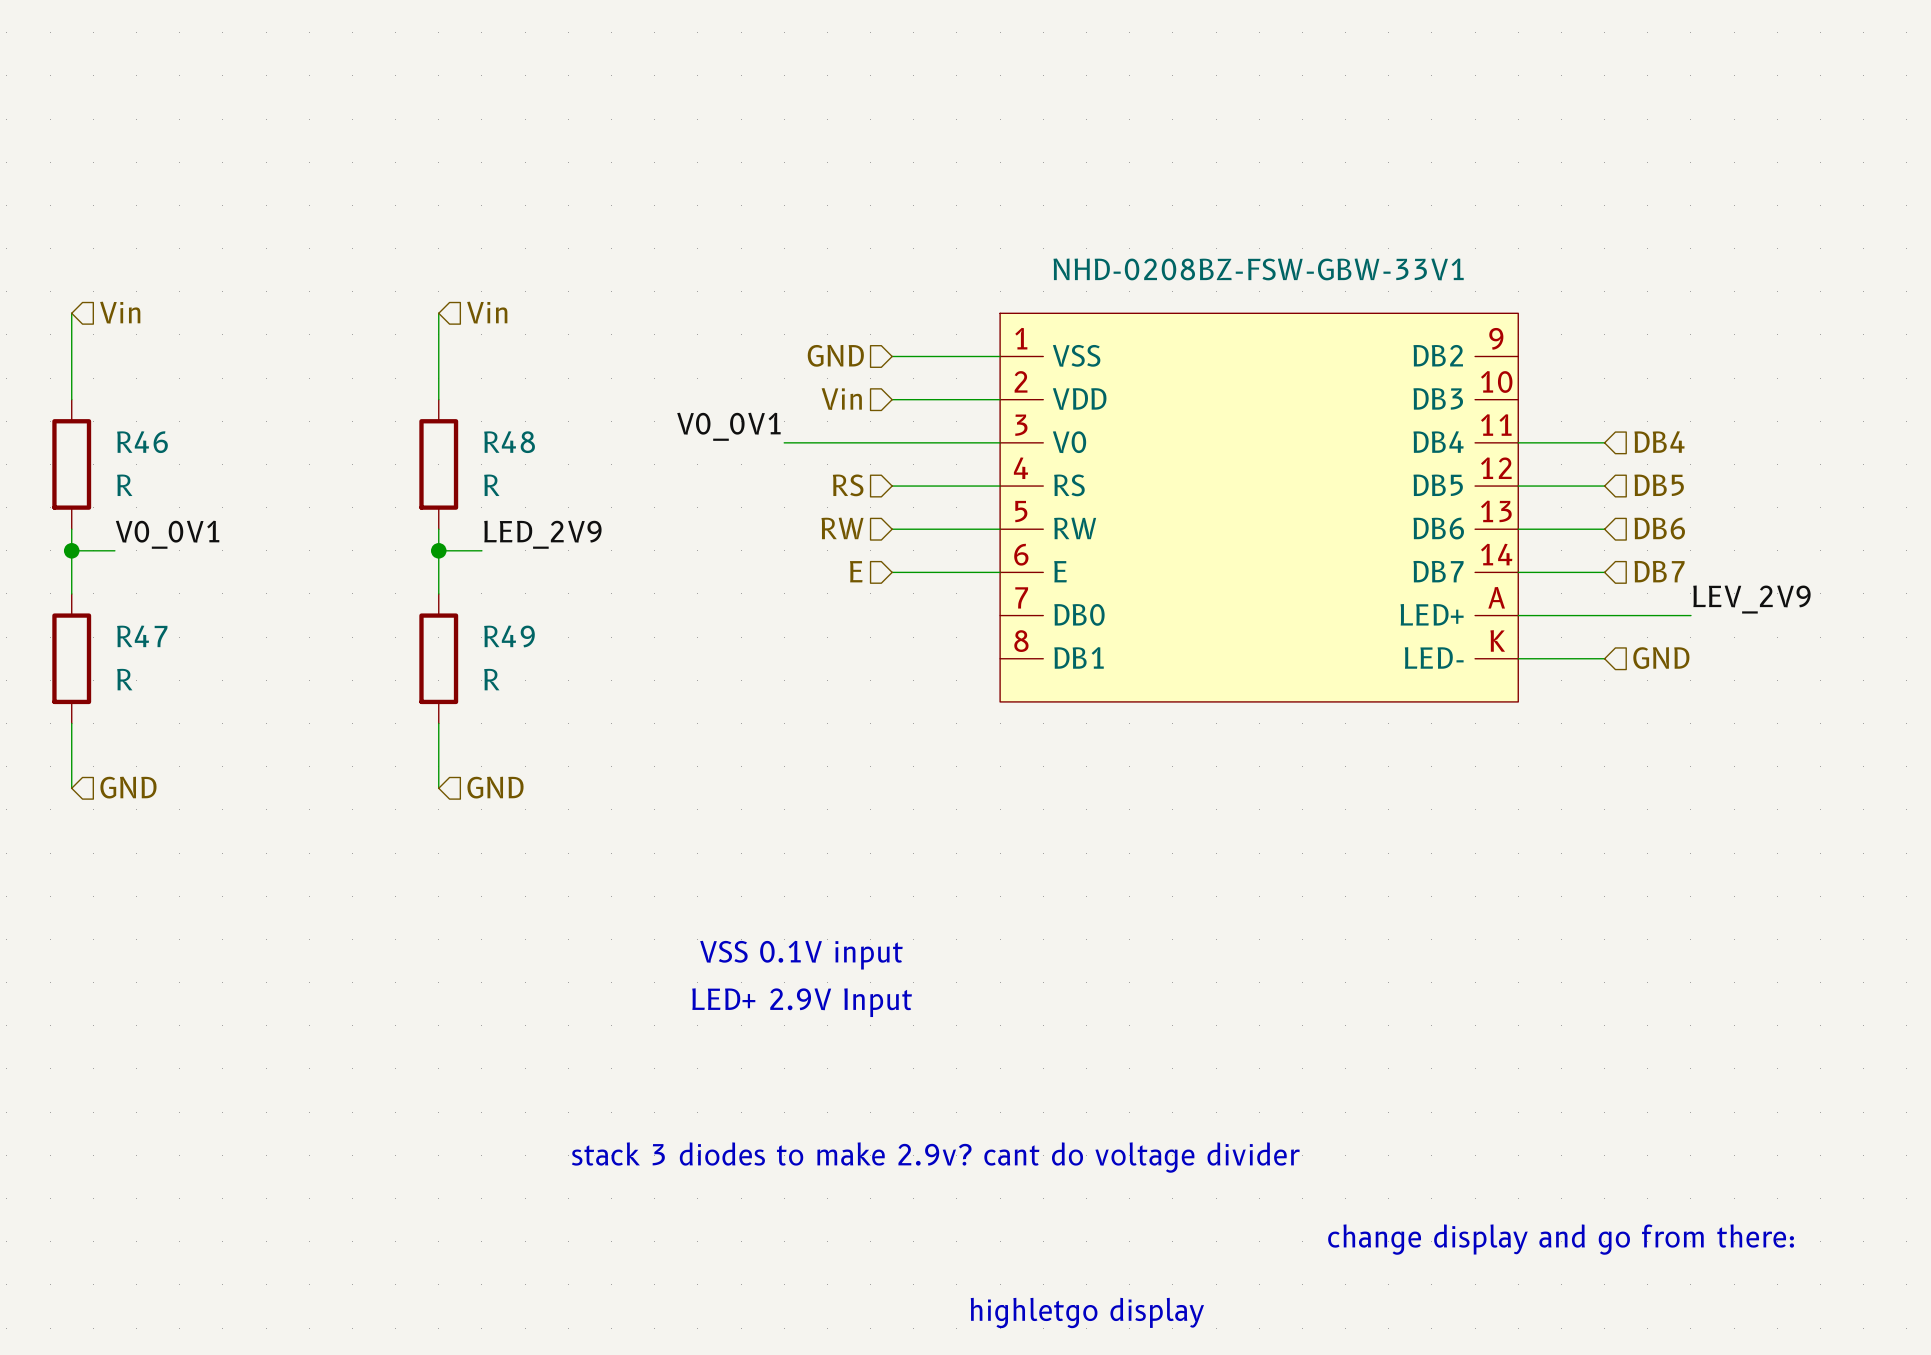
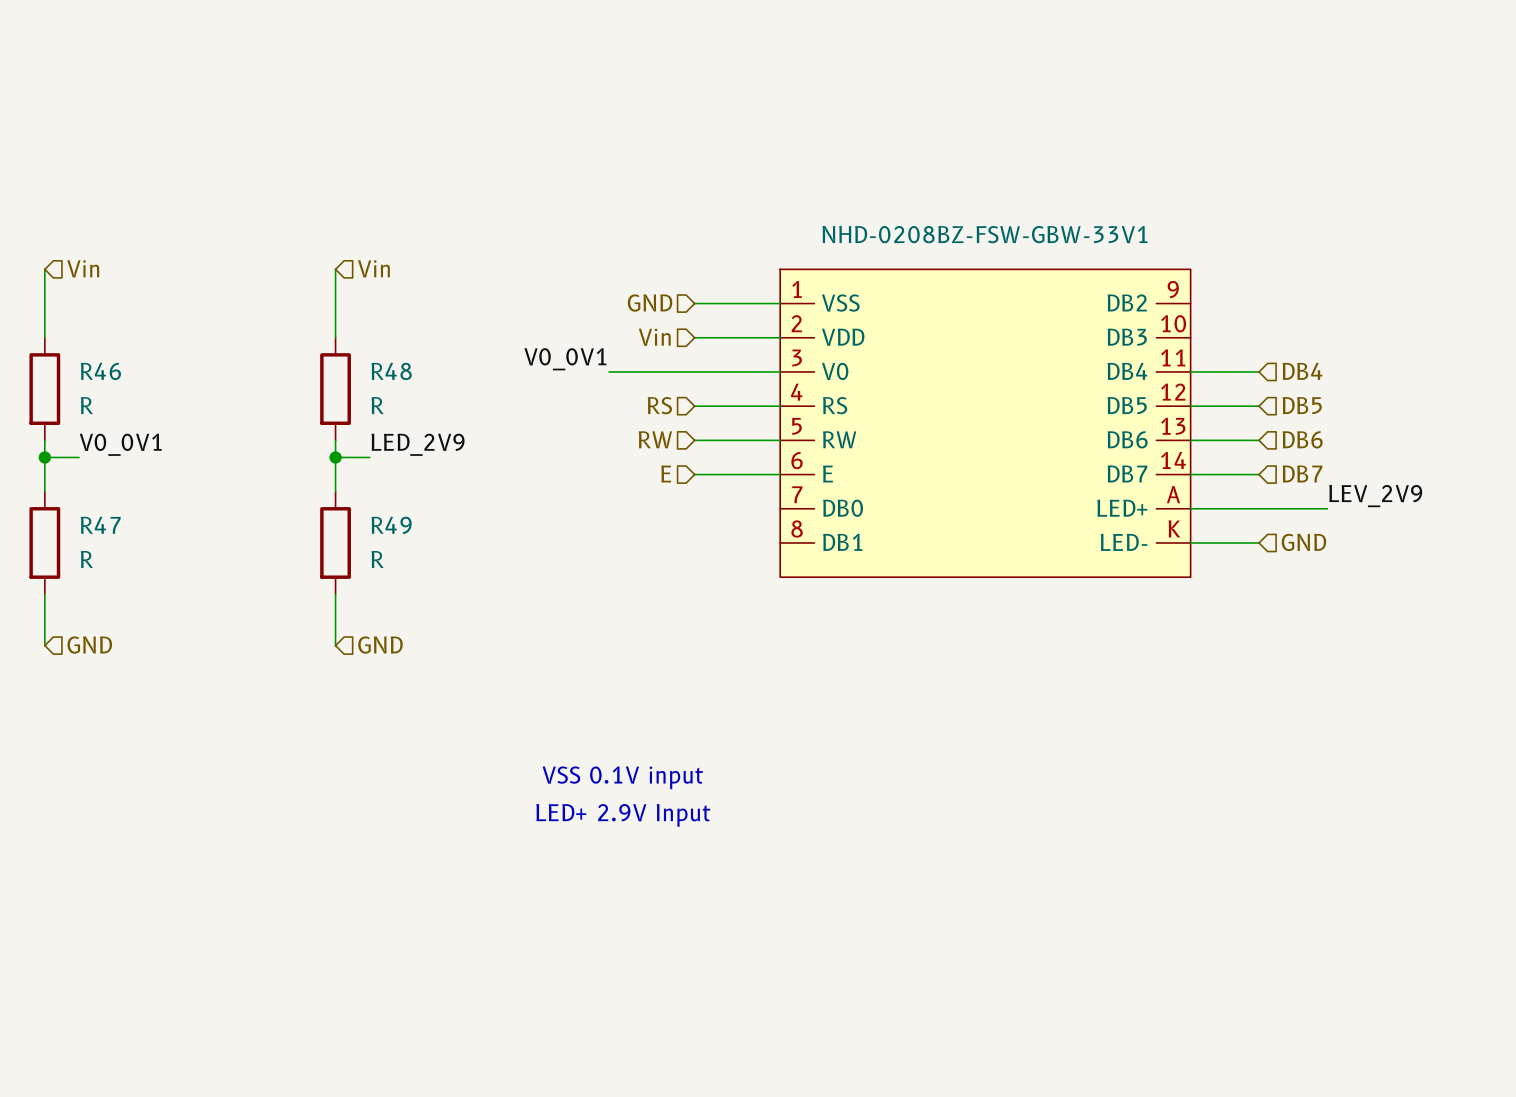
text: stack 3 diodes to make 2.9v? cant do voltage divider (935, 1157) -> none
text: change display and go from there: (1561, 1239) -> none
text: highletgo display (1087, 1313) -> none

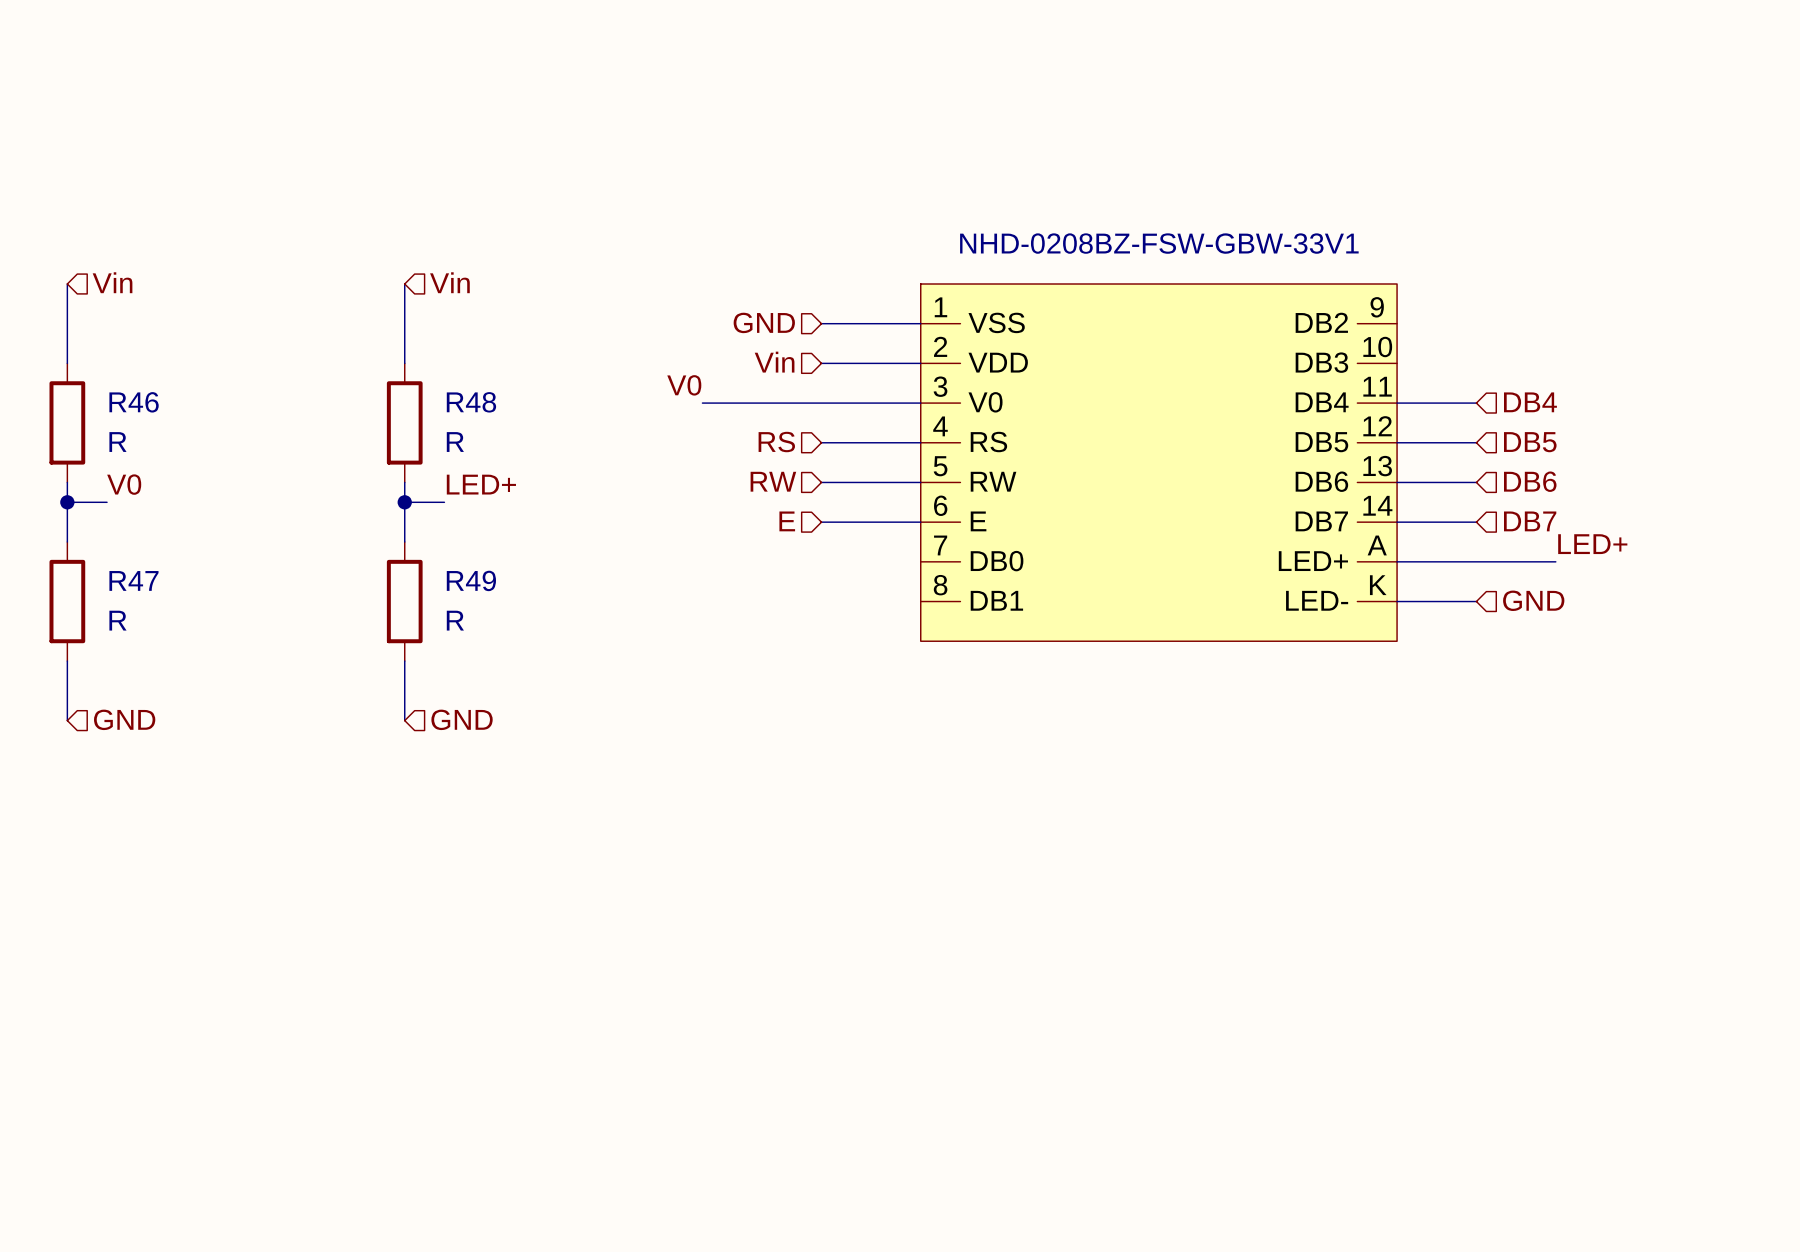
label: none -> V0 (684, 385)
label: V0_0V1 (565, 359) -> none
wire: none -> (702, 403) (722, 403)
label: V0_0V1 (120, 444) -> V0 (124, 484)
label: LED_2V9 (418, 444) -> LED+ (481, 484)
label: LEV_2V9 (1375, 496) -> LED+ (1592, 544)
text: VSS 0.1V input (622, 777) -> none
text: LED+ 2.9V Input (623, 815) -> none

